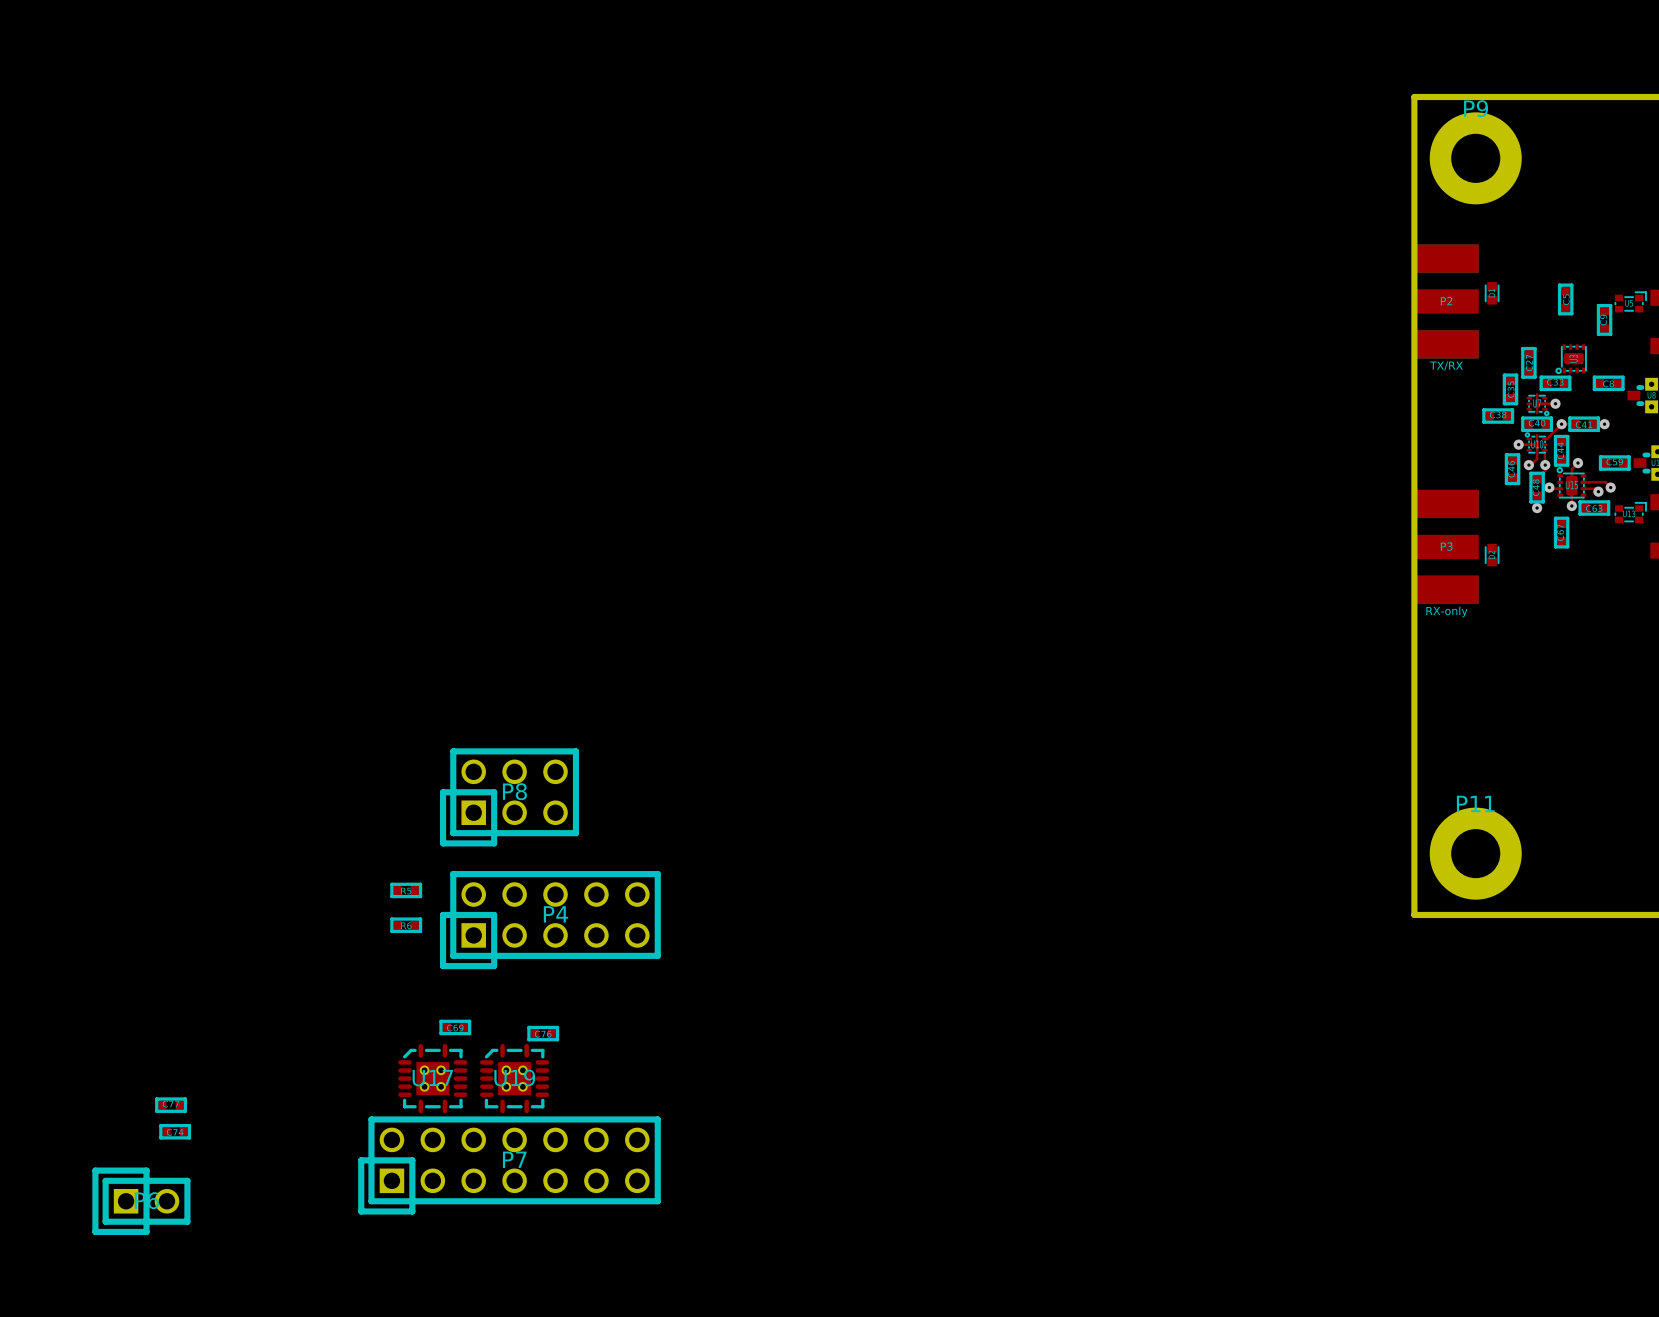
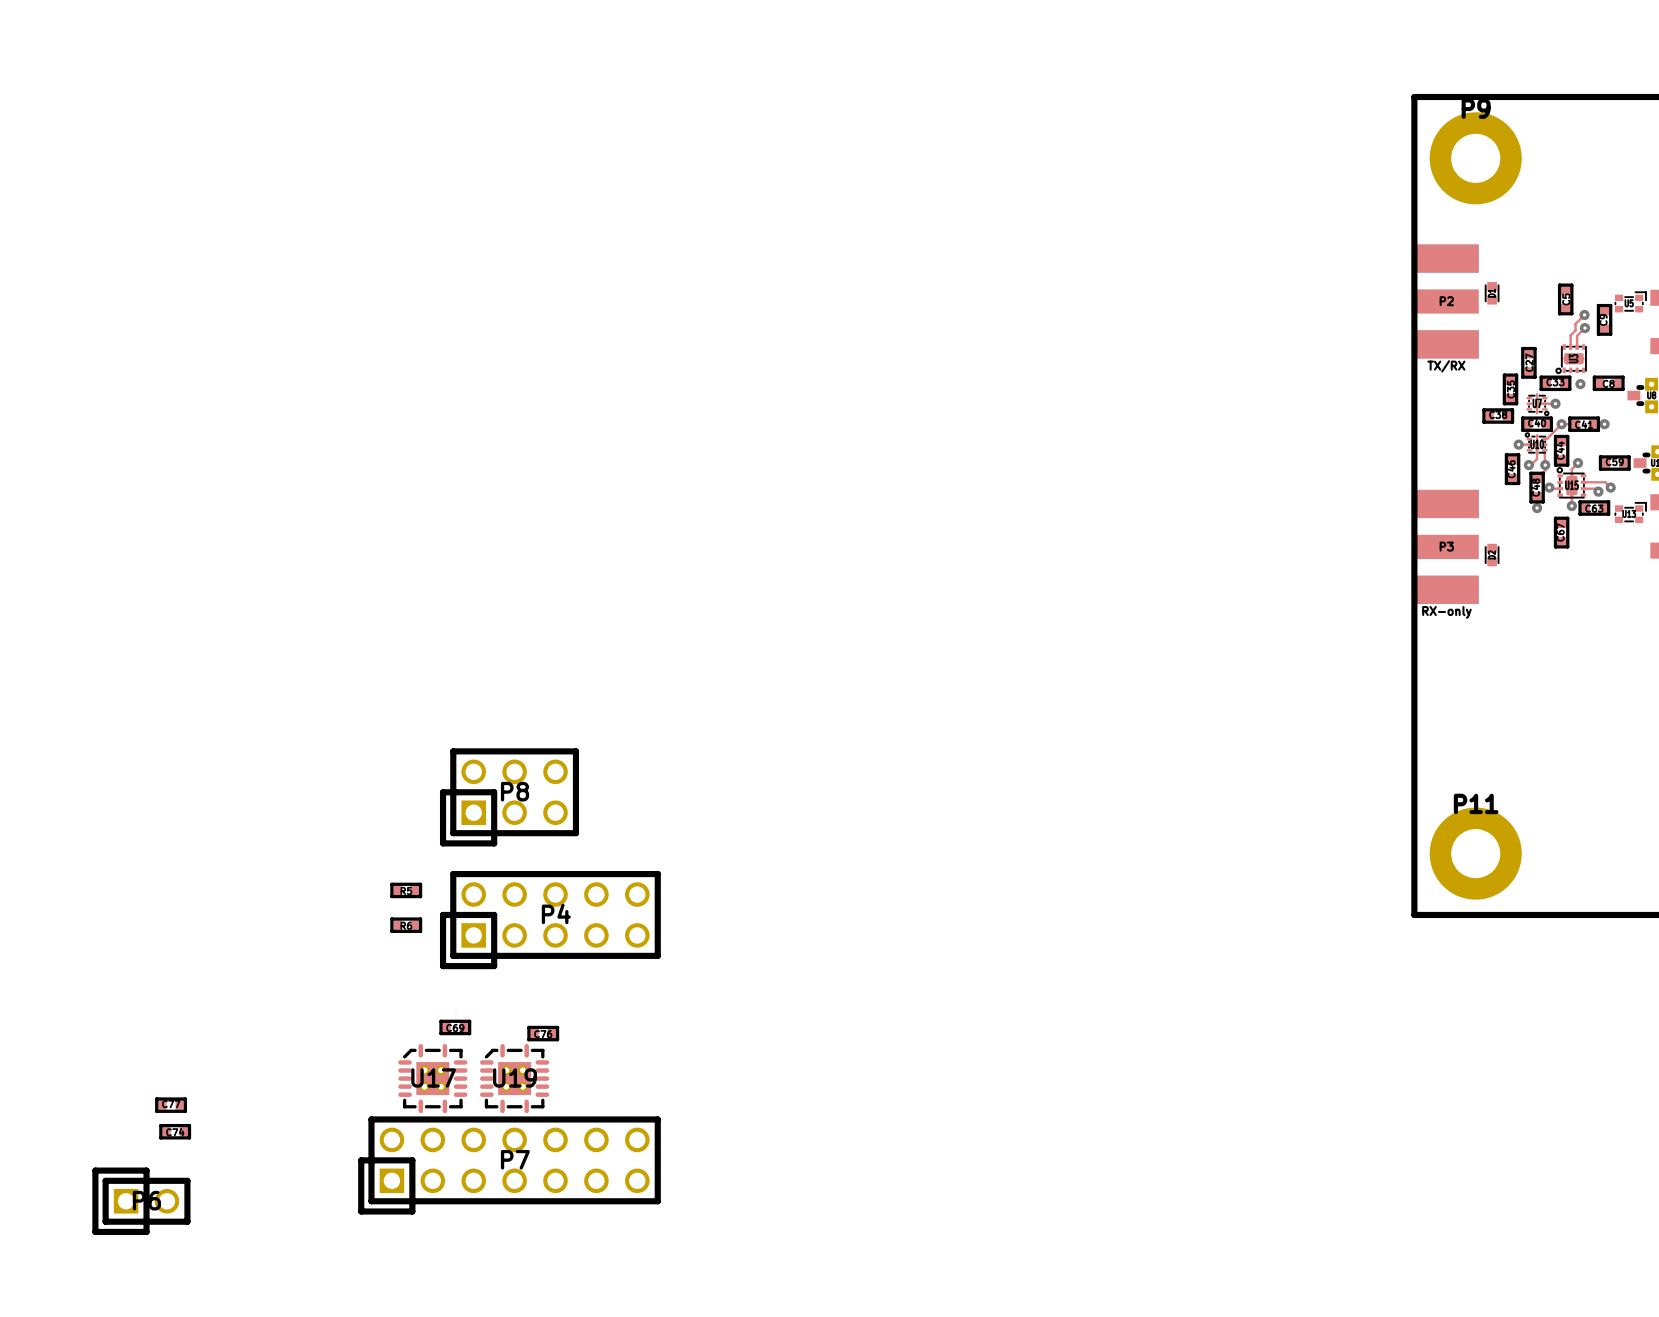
top track: none -> (1584, 314) (1575, 323) (1575, 330) (1570, 335) (1570, 347)
via: none -> (1584, 314)
top track: none -> (1584, 328) (1577, 335) (1577, 347)
via: none -> (1584, 328)
via: none -> (1580, 384)

